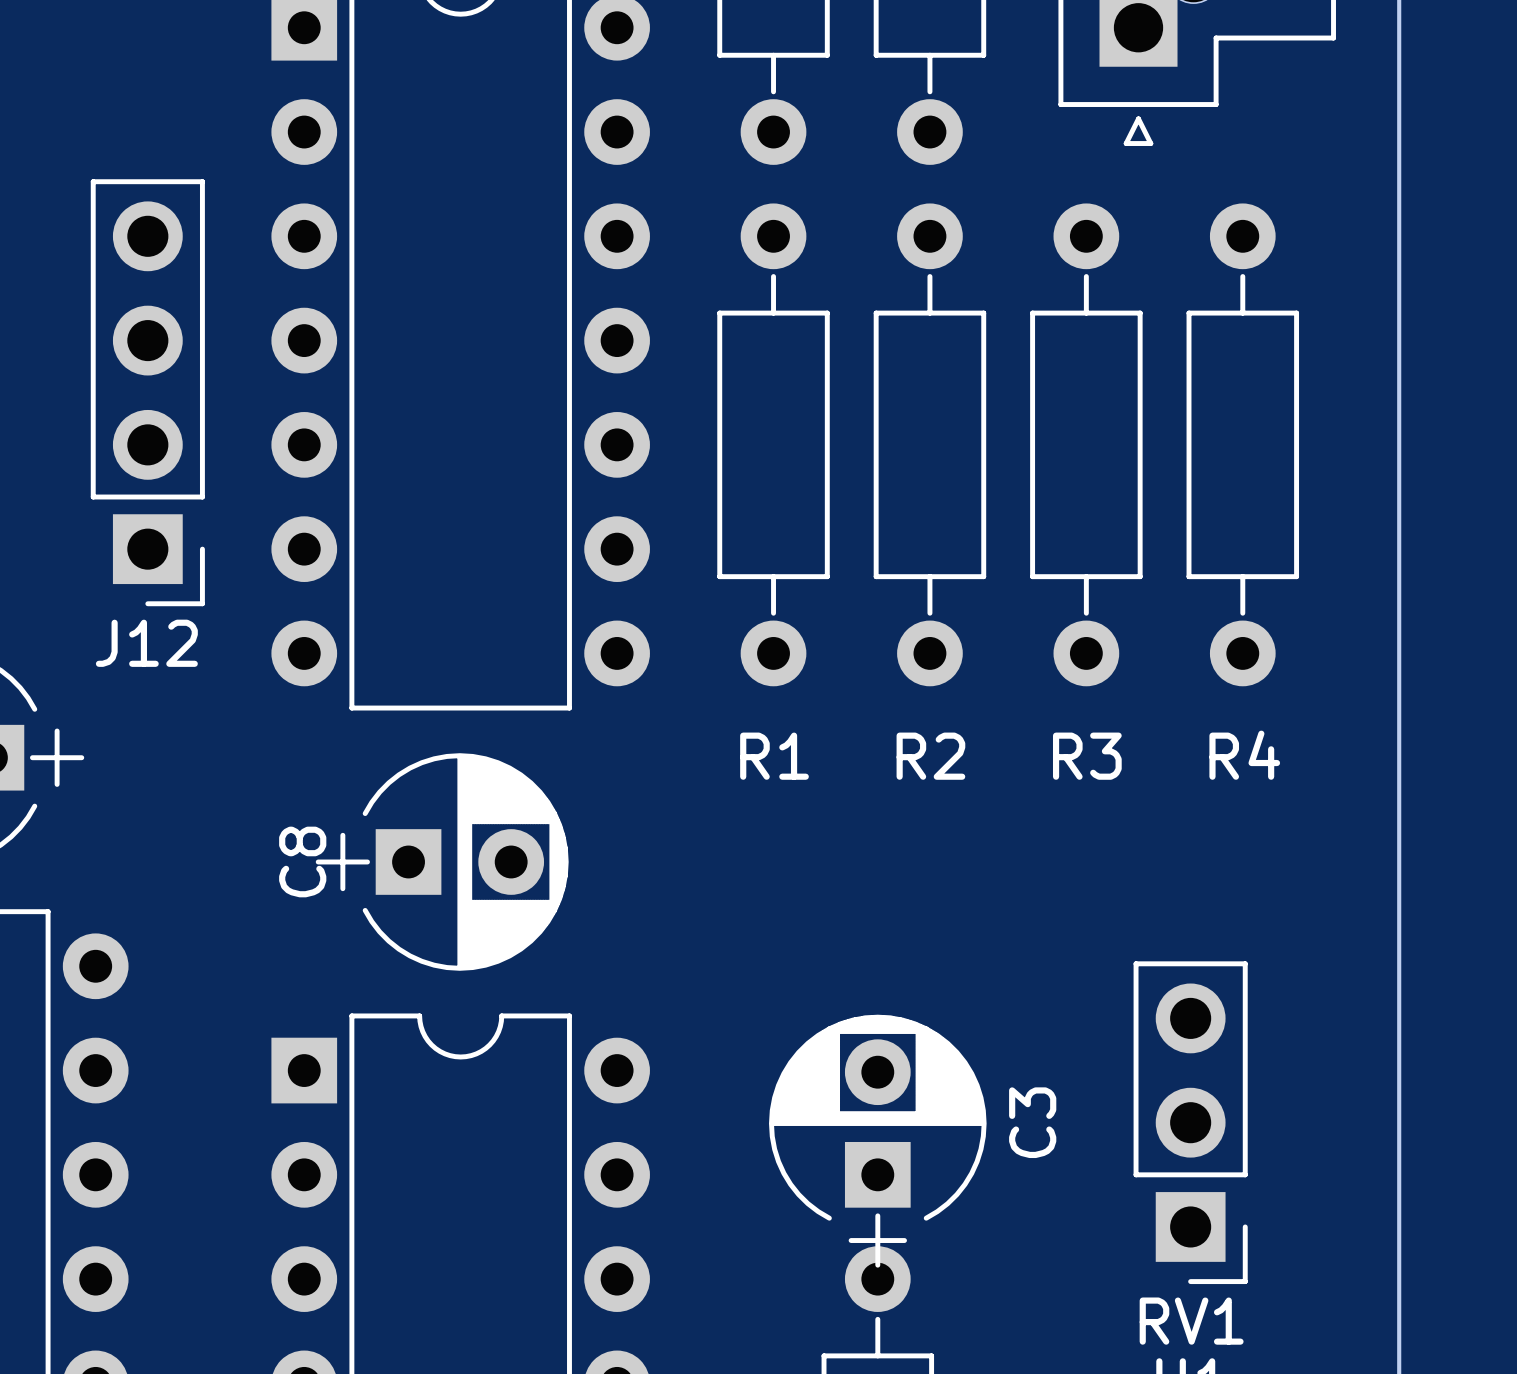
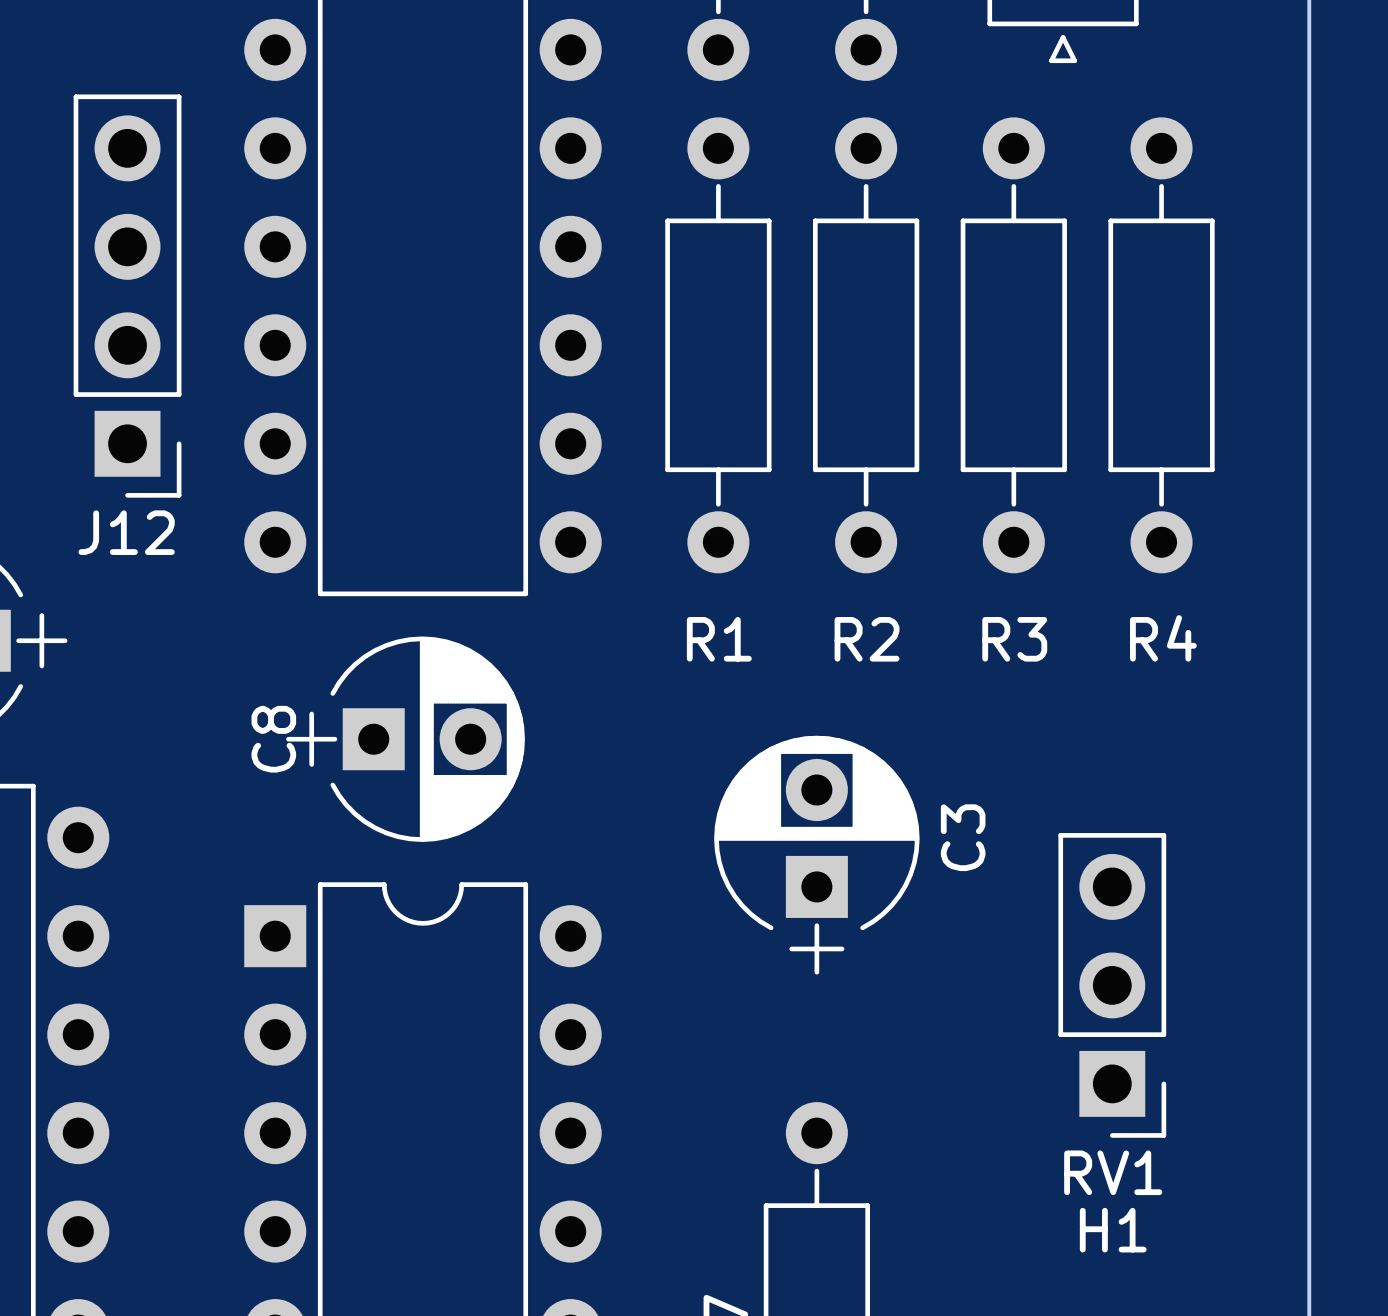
C3 position: (877, 1141) -> (816, 855)

